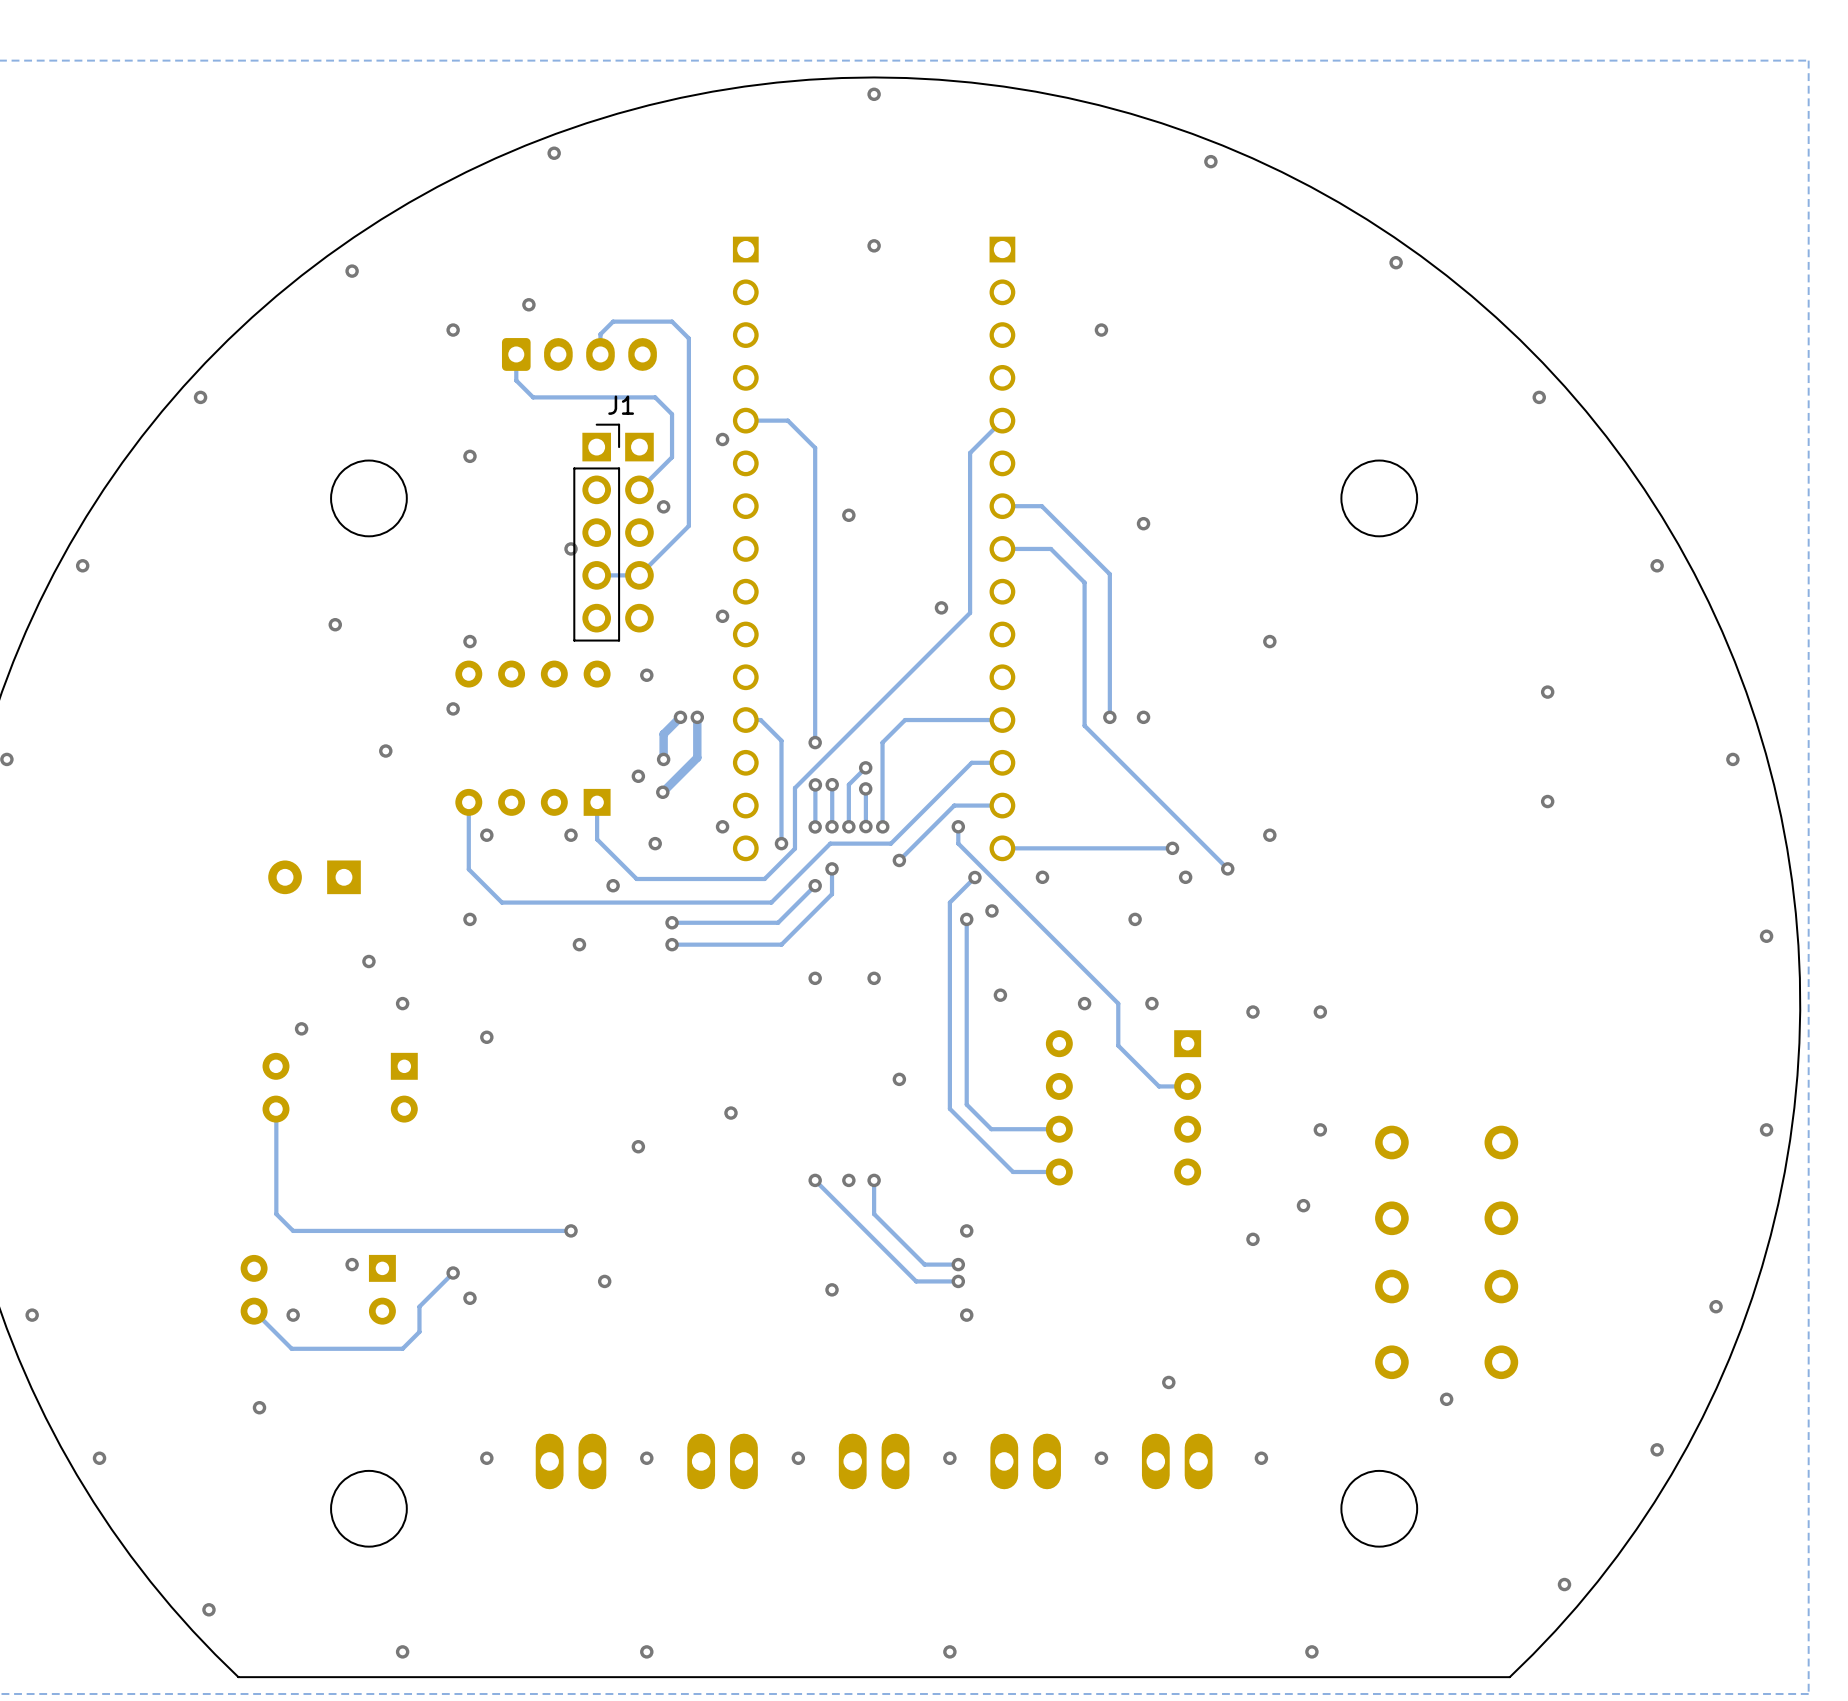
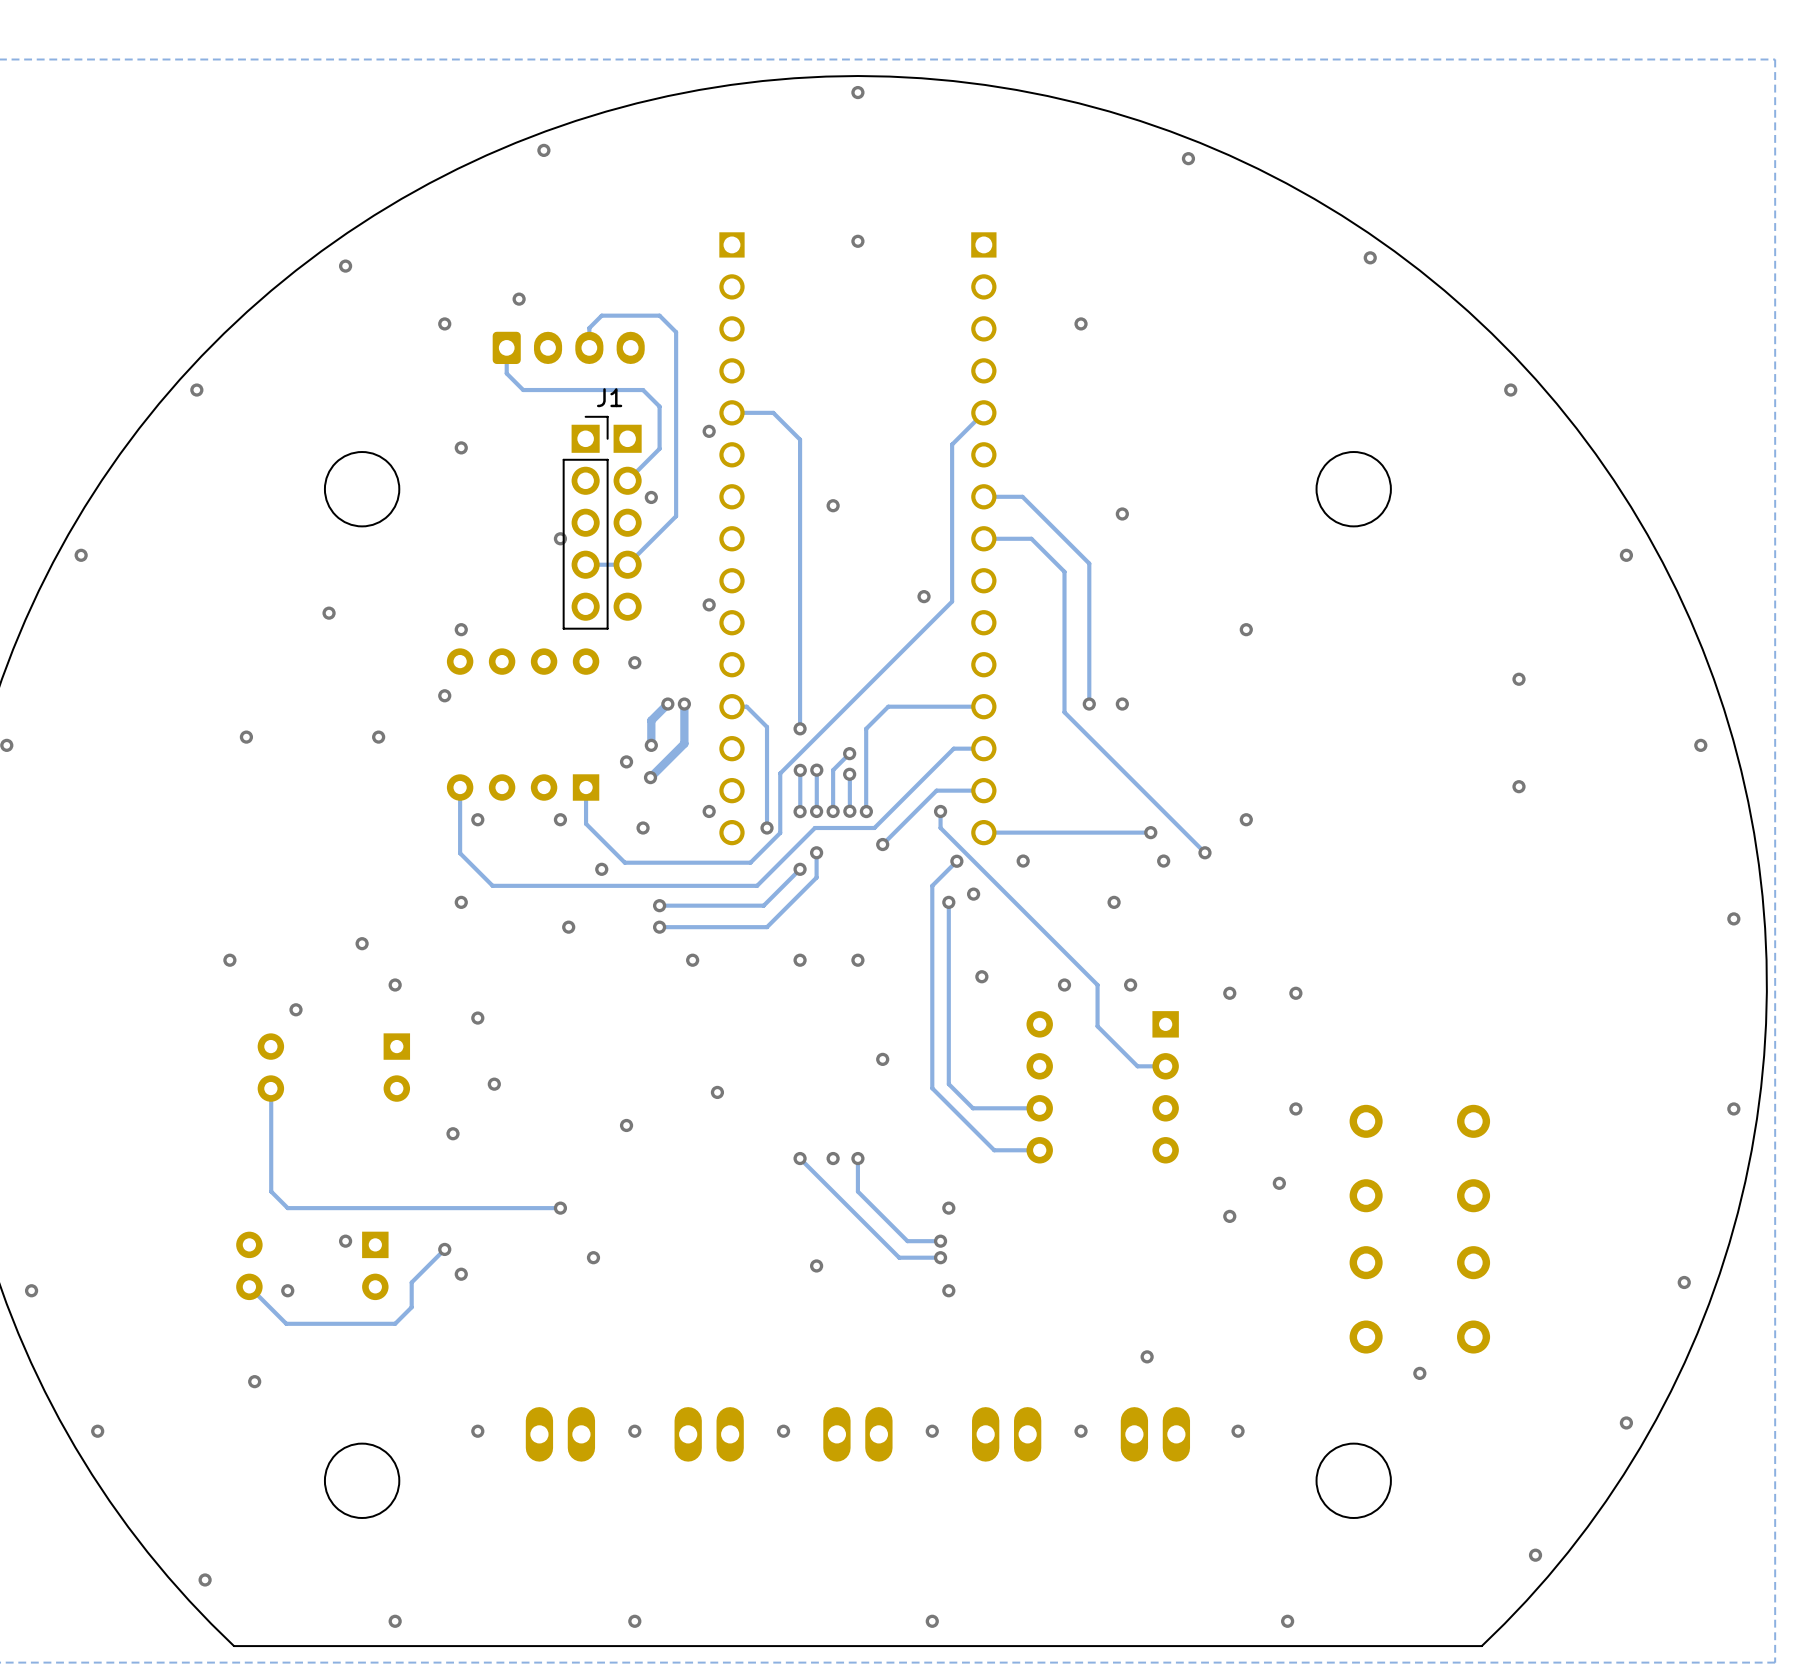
via: none -> (246, 737)
part: (314, 877) -> none
via: none -> (229, 960)
via: none -> (692, 960)
via: none -> (494, 1084)
via: none -> (453, 1133)

